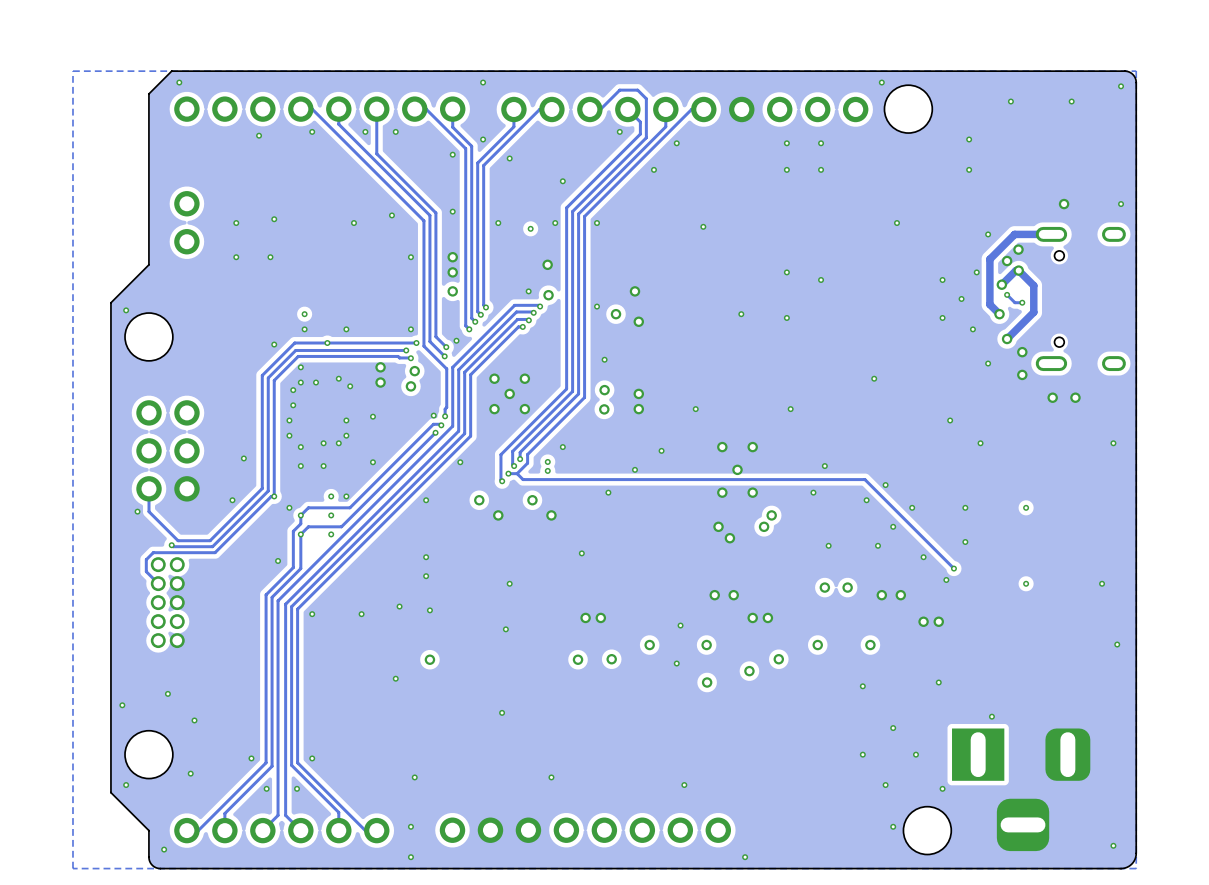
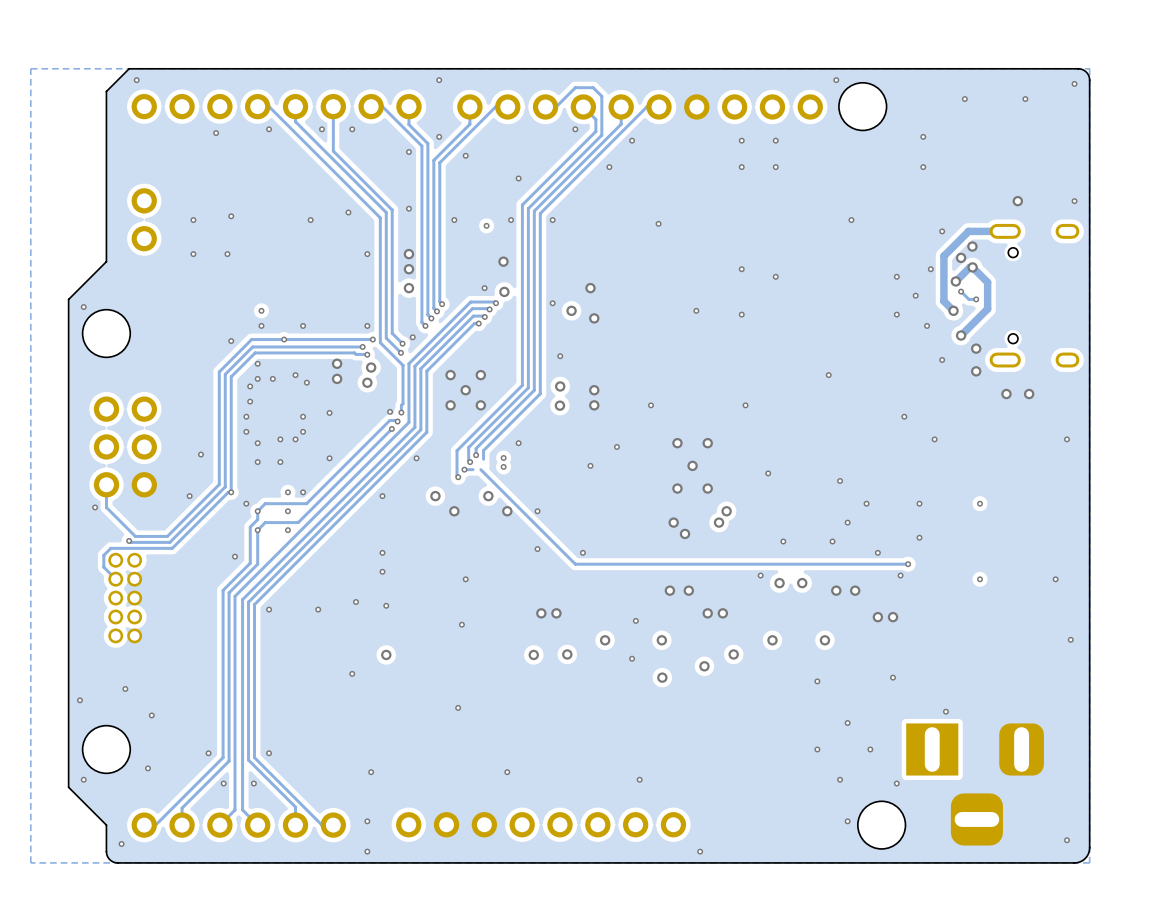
track: (527, 463) (517, 473) (523, 479) (864, 479) (953, 568) -> (480, 469) (575, 564) (908, 564)
via: (824, 466) -> none
via: none -> (768, 473)
via: (608, 492) -> none
via: (813, 492) -> none
via: (866, 500) -> none
via: none -> (537, 511)
via: none -> (582, 552)
via: none -> (760, 575)

